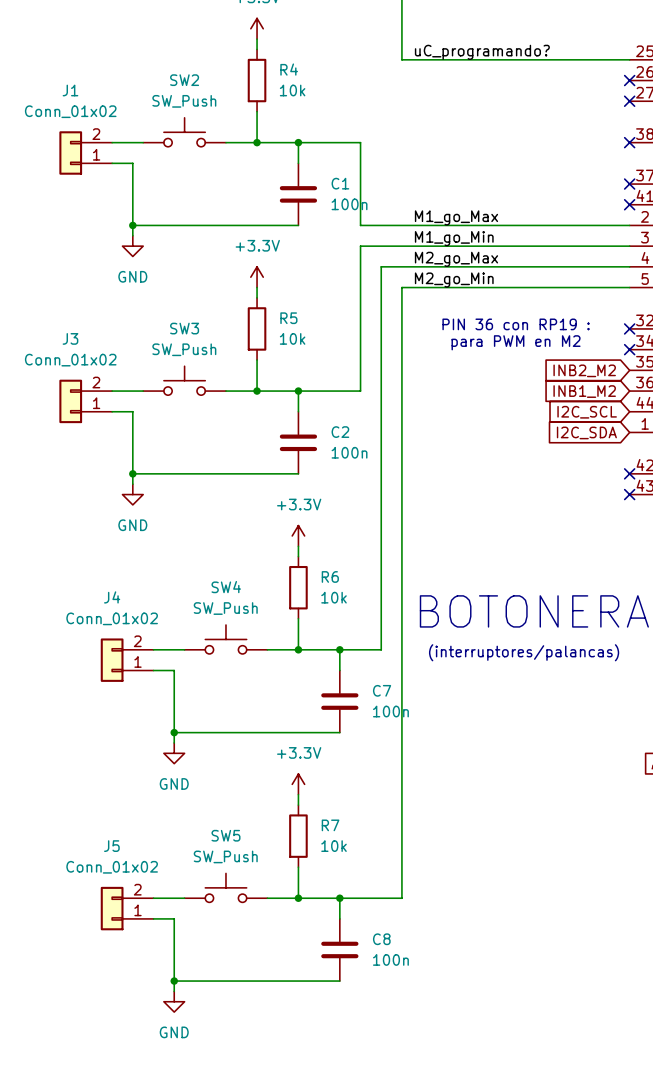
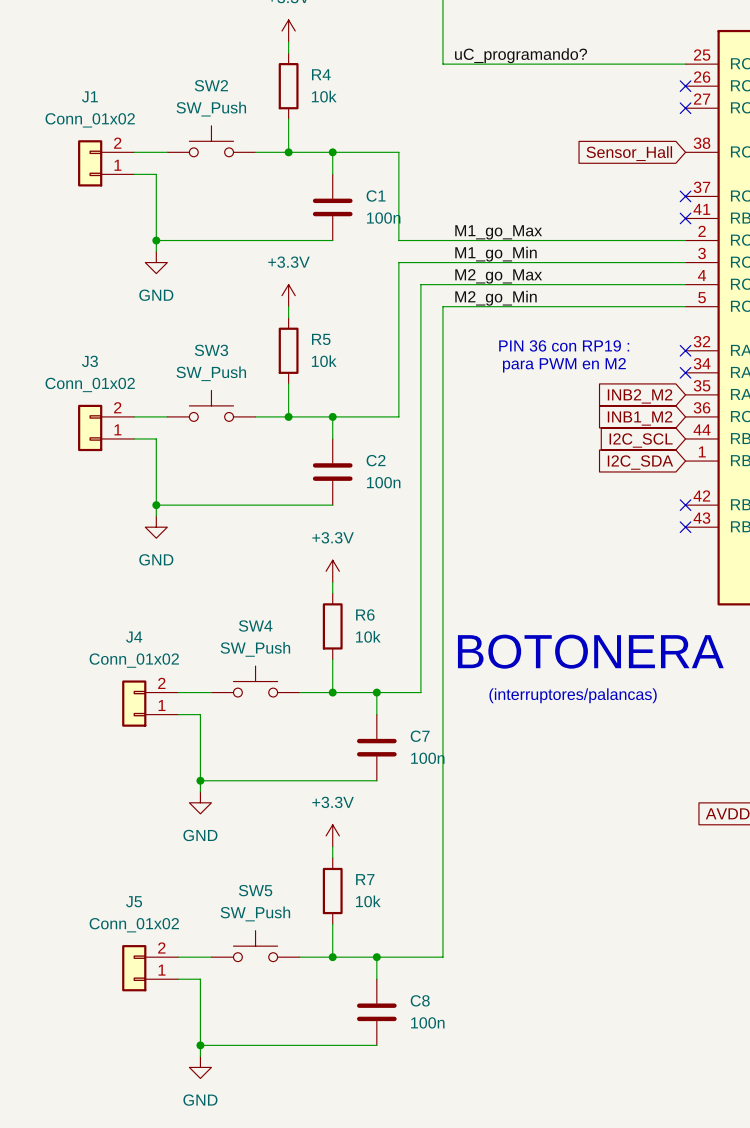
no-connect mark: (629, 142) -> none
global label: none -> Sensor_Hall (629, 153)

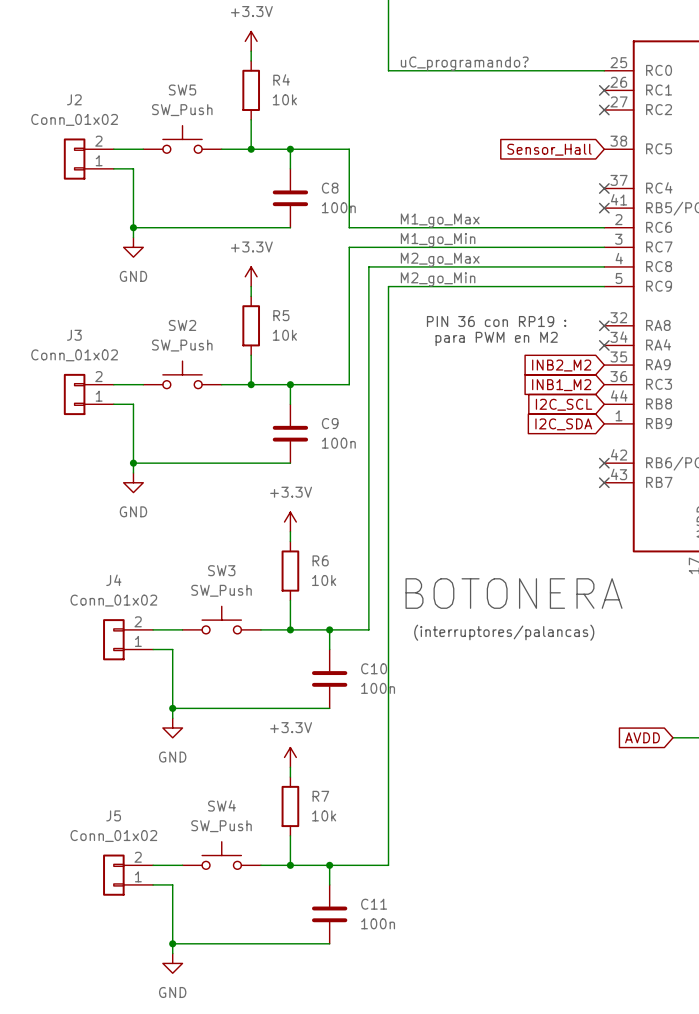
SW2 name: SW2 (211, 85) -> SW5 (182, 90)
J1 name: J1 (89, 96) -> J2 (74, 99)
C1 name: C1 (376, 196) -> C8 (330, 188)
SW3 name: SW3 (211, 350) -> SW2 (182, 325)
C2 name: C2 (376, 460) -> C9 (330, 423)
SW4 name: SW4 (255, 625) -> SW3 (221, 570)
C7 name: C7 (420, 736) -> C10 (374, 668)
SW5 name: SW5 (255, 890) -> SW4 (221, 805)
C8 name: C8 (420, 1000) -> C11 (374, 904)

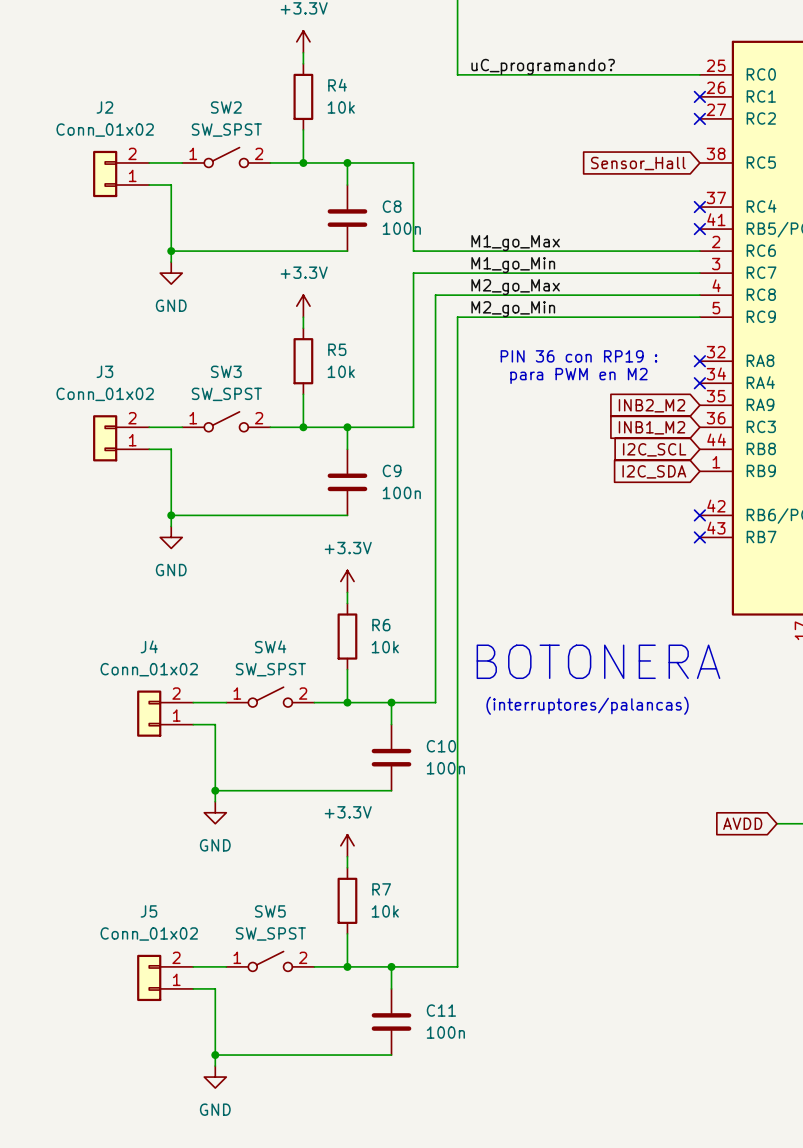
SW5 value: SW_Push (182, 110) -> SW_SPST (270, 933)
SW5 symbol: [143, 125, 222, 154] -> [226, 951, 315, 972]
SW2 value: SW_Push (182, 345) -> SW_SPST (226, 130)
SW2 symbol: [143, 361, 222, 389] -> [182, 147, 271, 168]
SW3 value: SW_Push (221, 590) -> SW_SPST (226, 394)
SW3 symbol: [182, 606, 261, 634] -> [182, 411, 271, 432]
SW4 value: SW_Push (221, 826) -> SW_SPST (270, 669)
SW4 symbol: [182, 841, 261, 870] -> [226, 687, 315, 708]

